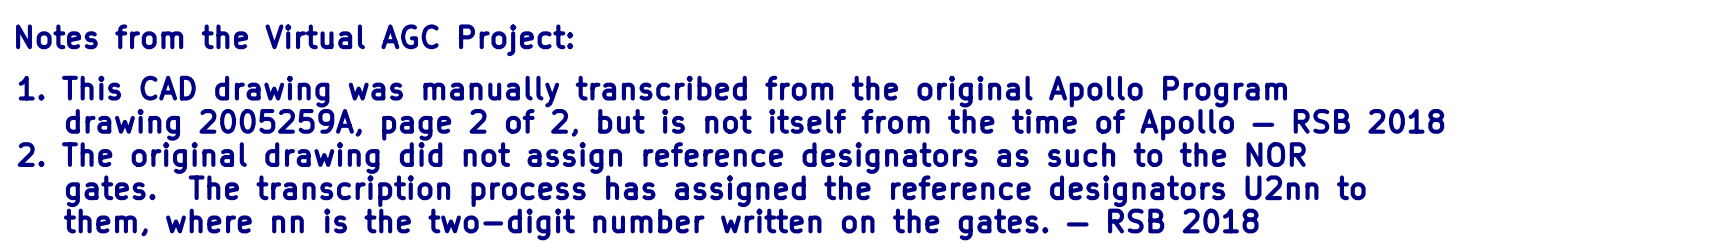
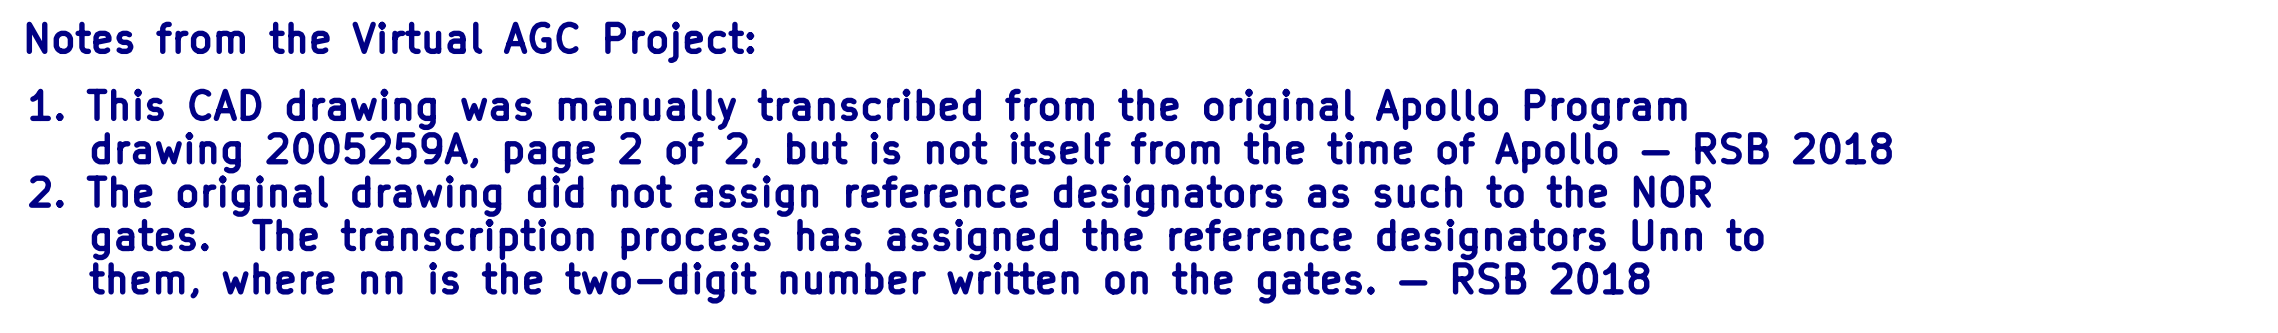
text: gates. The transcription process has assigned the reference designators U2nn to (715, 191) -> gates. The transcription process has assigned the reference designators Unn to (927, 239)

